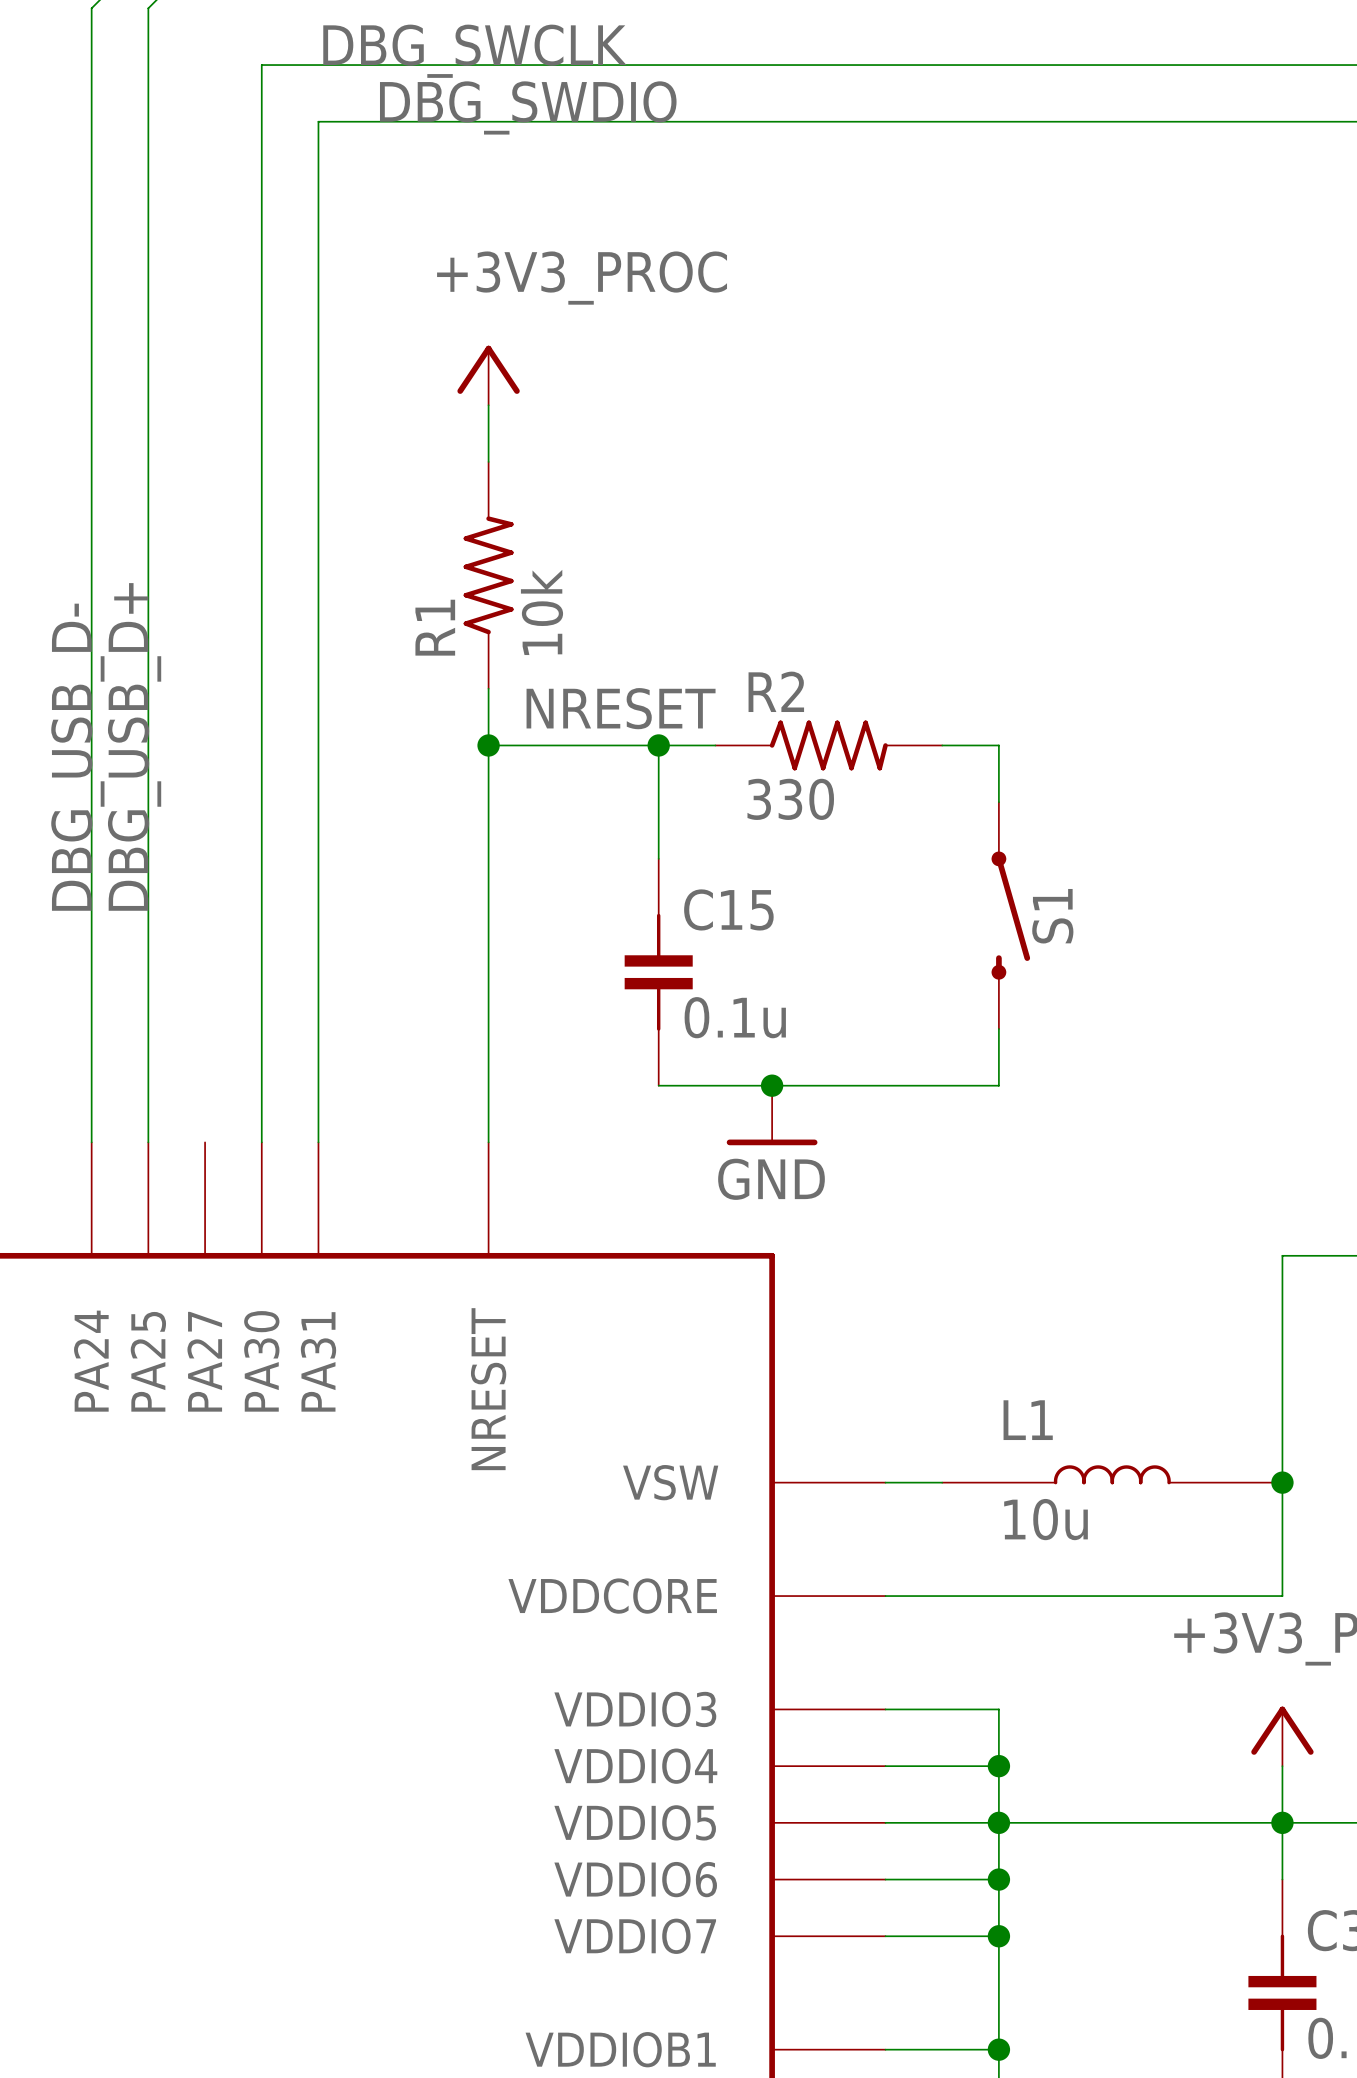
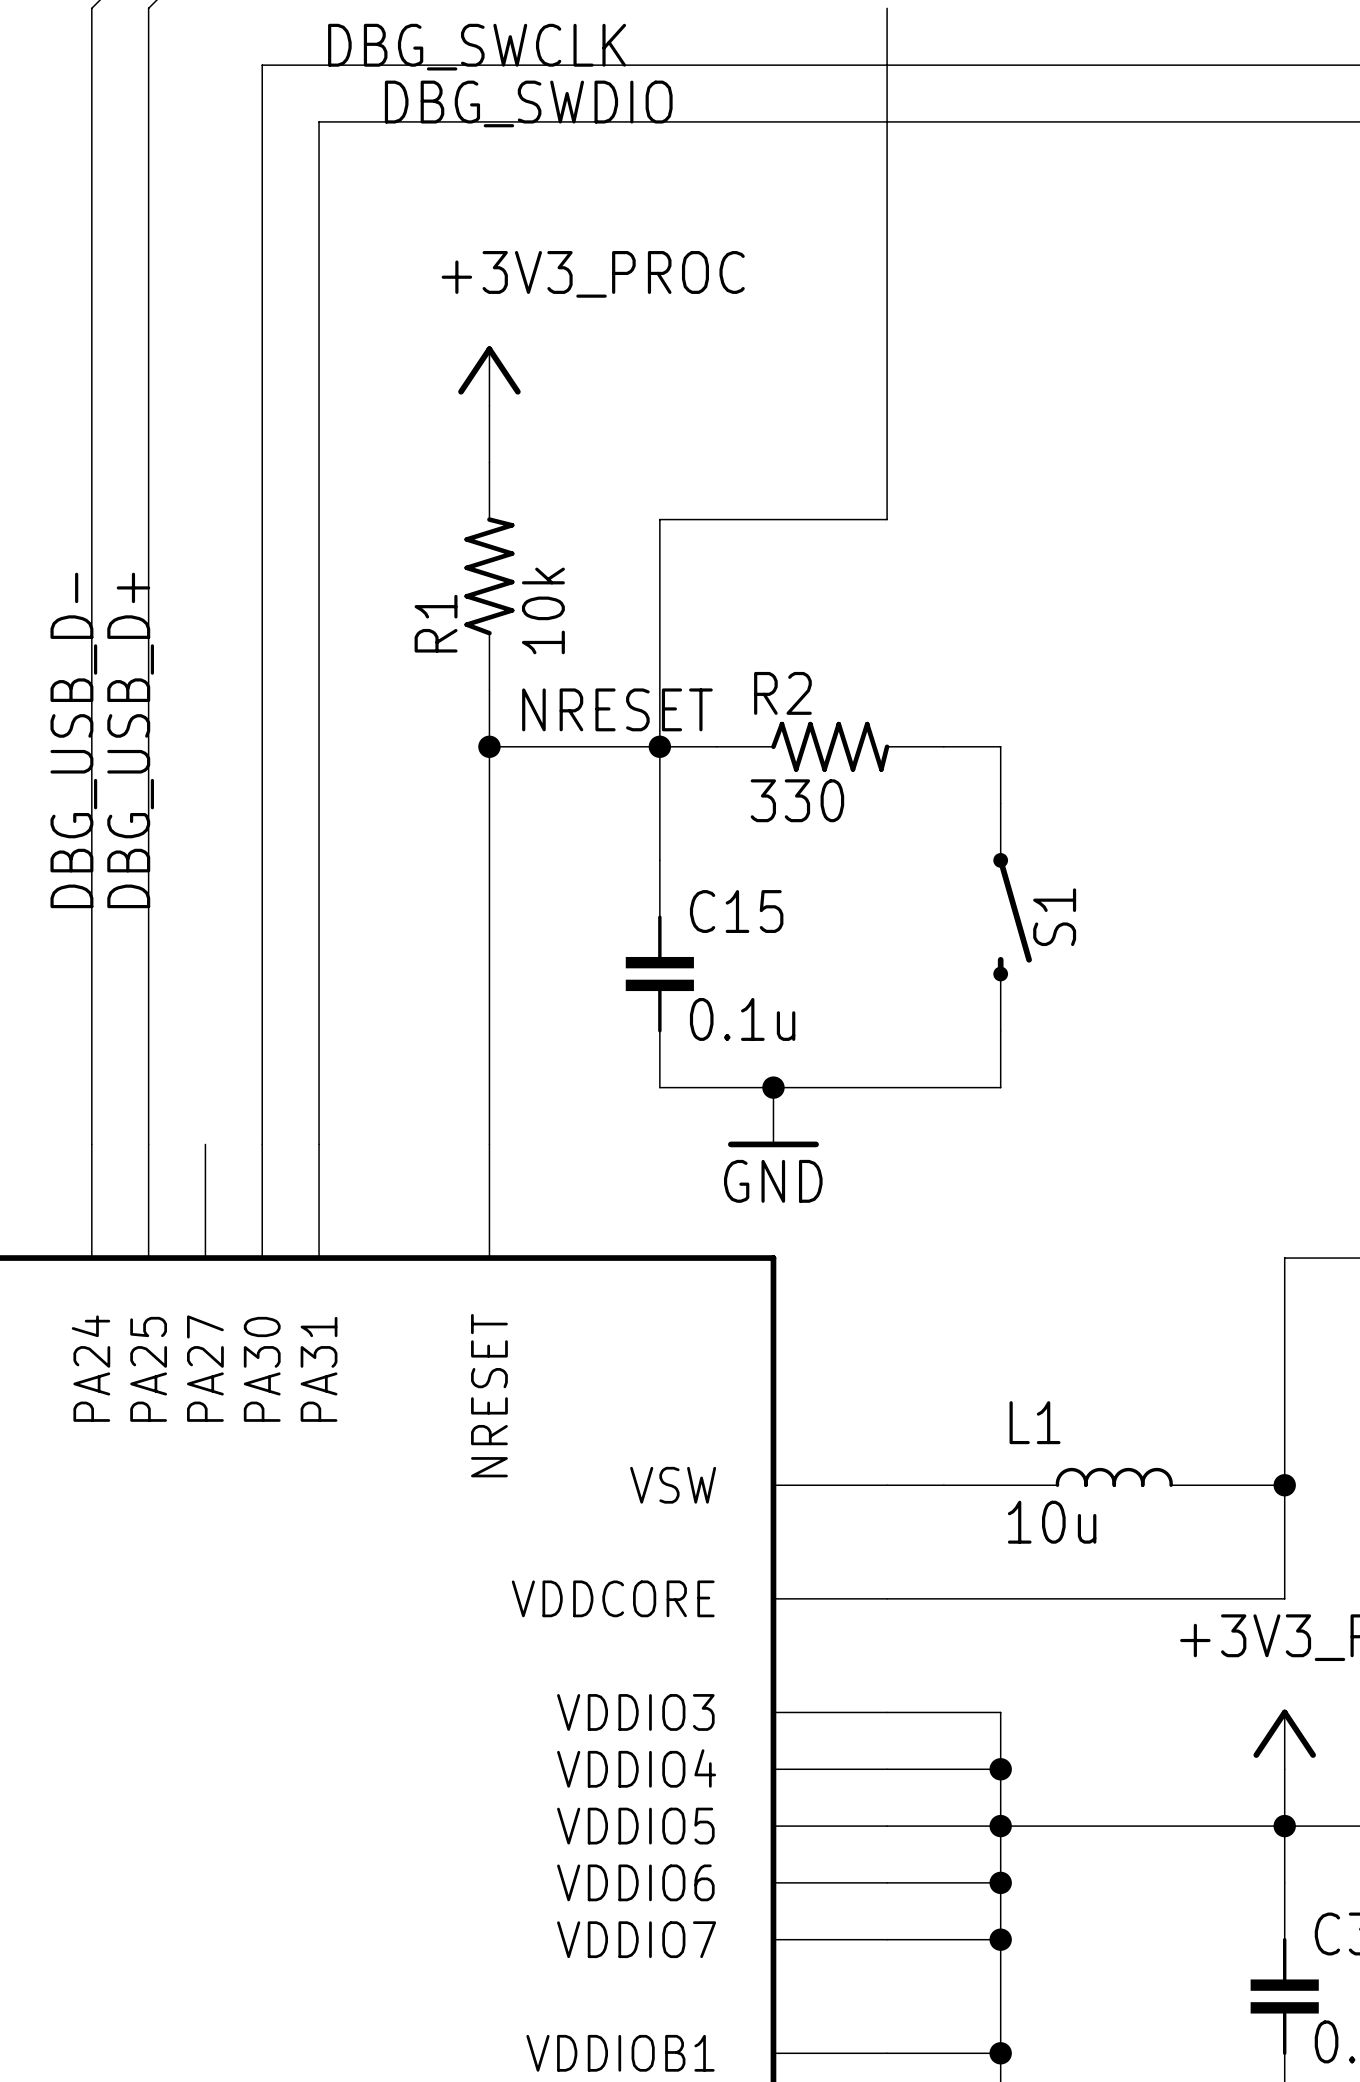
wire: none -> (887, 8) (887, 519) (659, 519) (659, 746)

